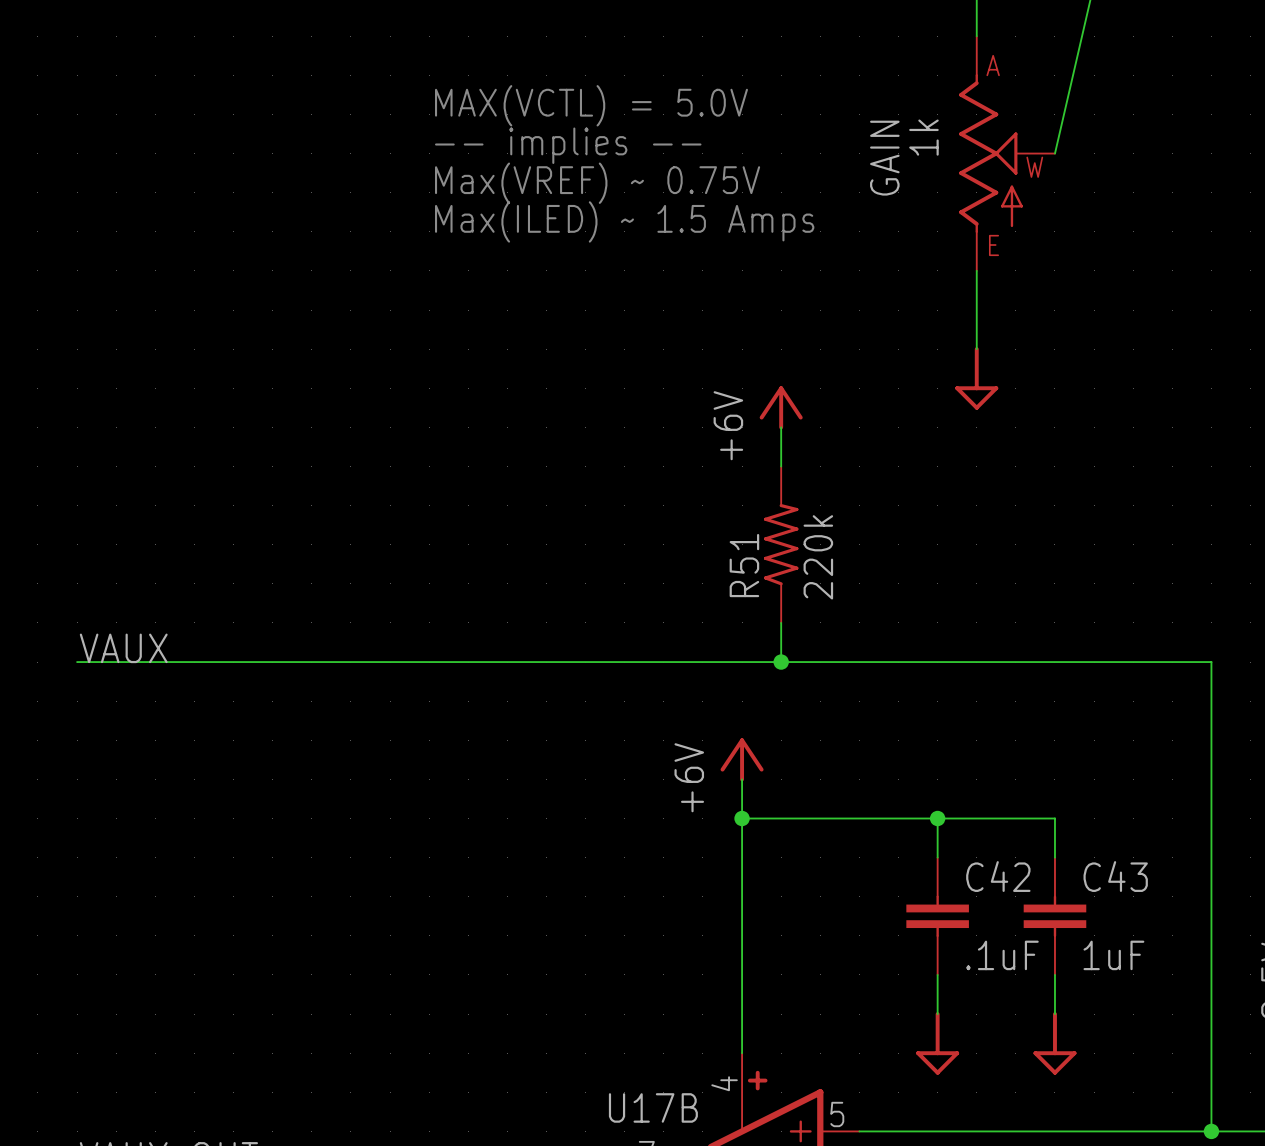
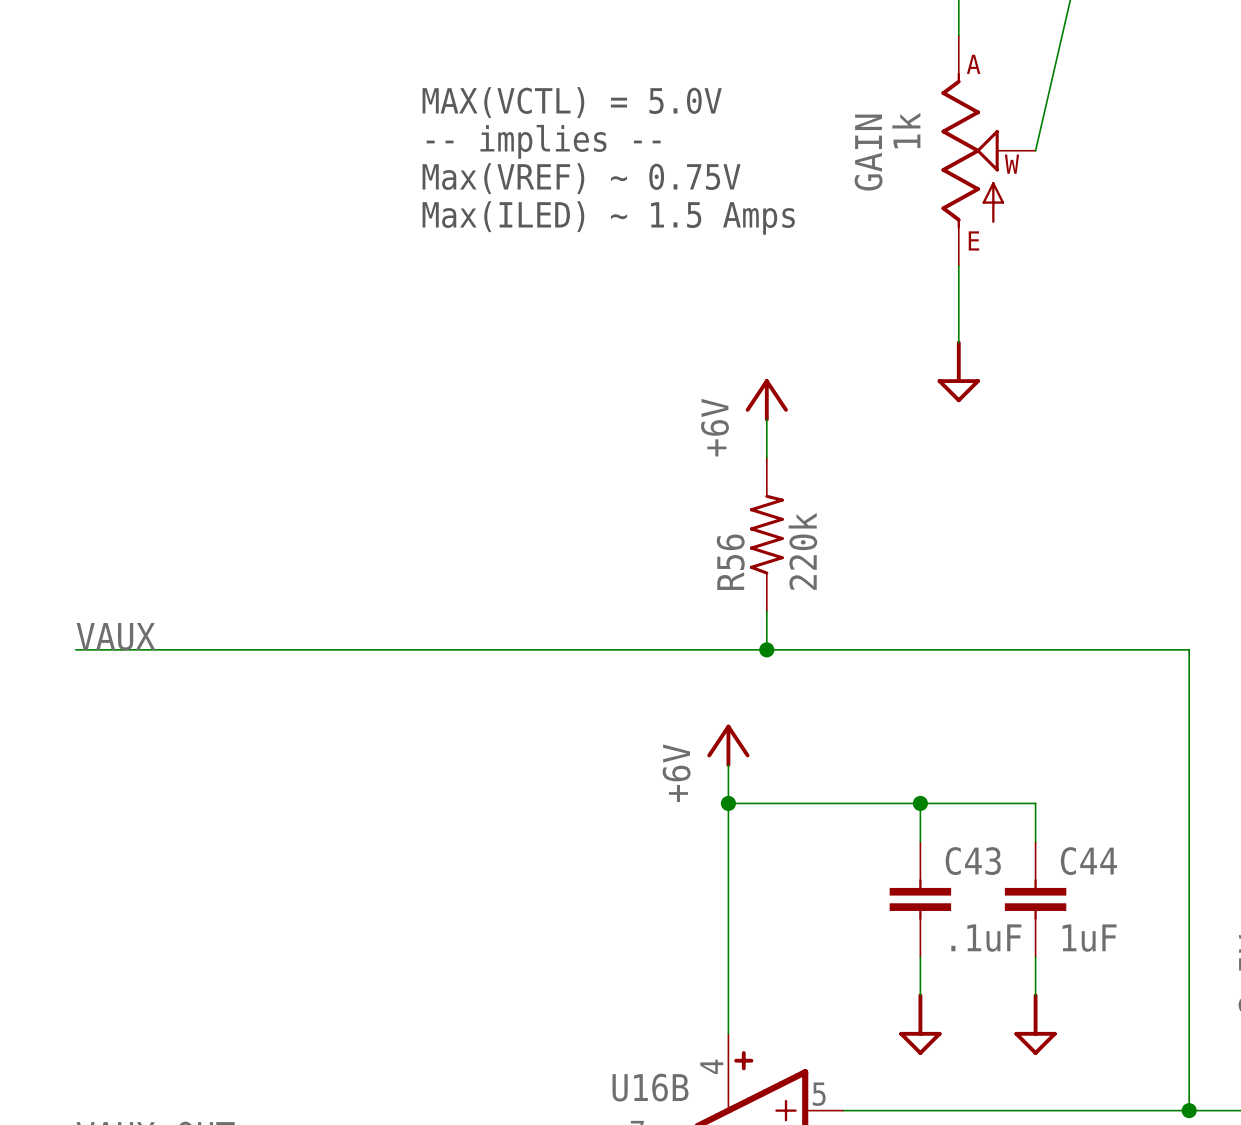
R51 name: R51 (744, 565) -> R56 (730, 562)
C42 name: C42 (998, 876) -> C43 (973, 861)
C43 name: C43 (1115, 876) -> C44 (1088, 861)
U17B name: U17B (653, 1107) -> U16B (650, 1087)

